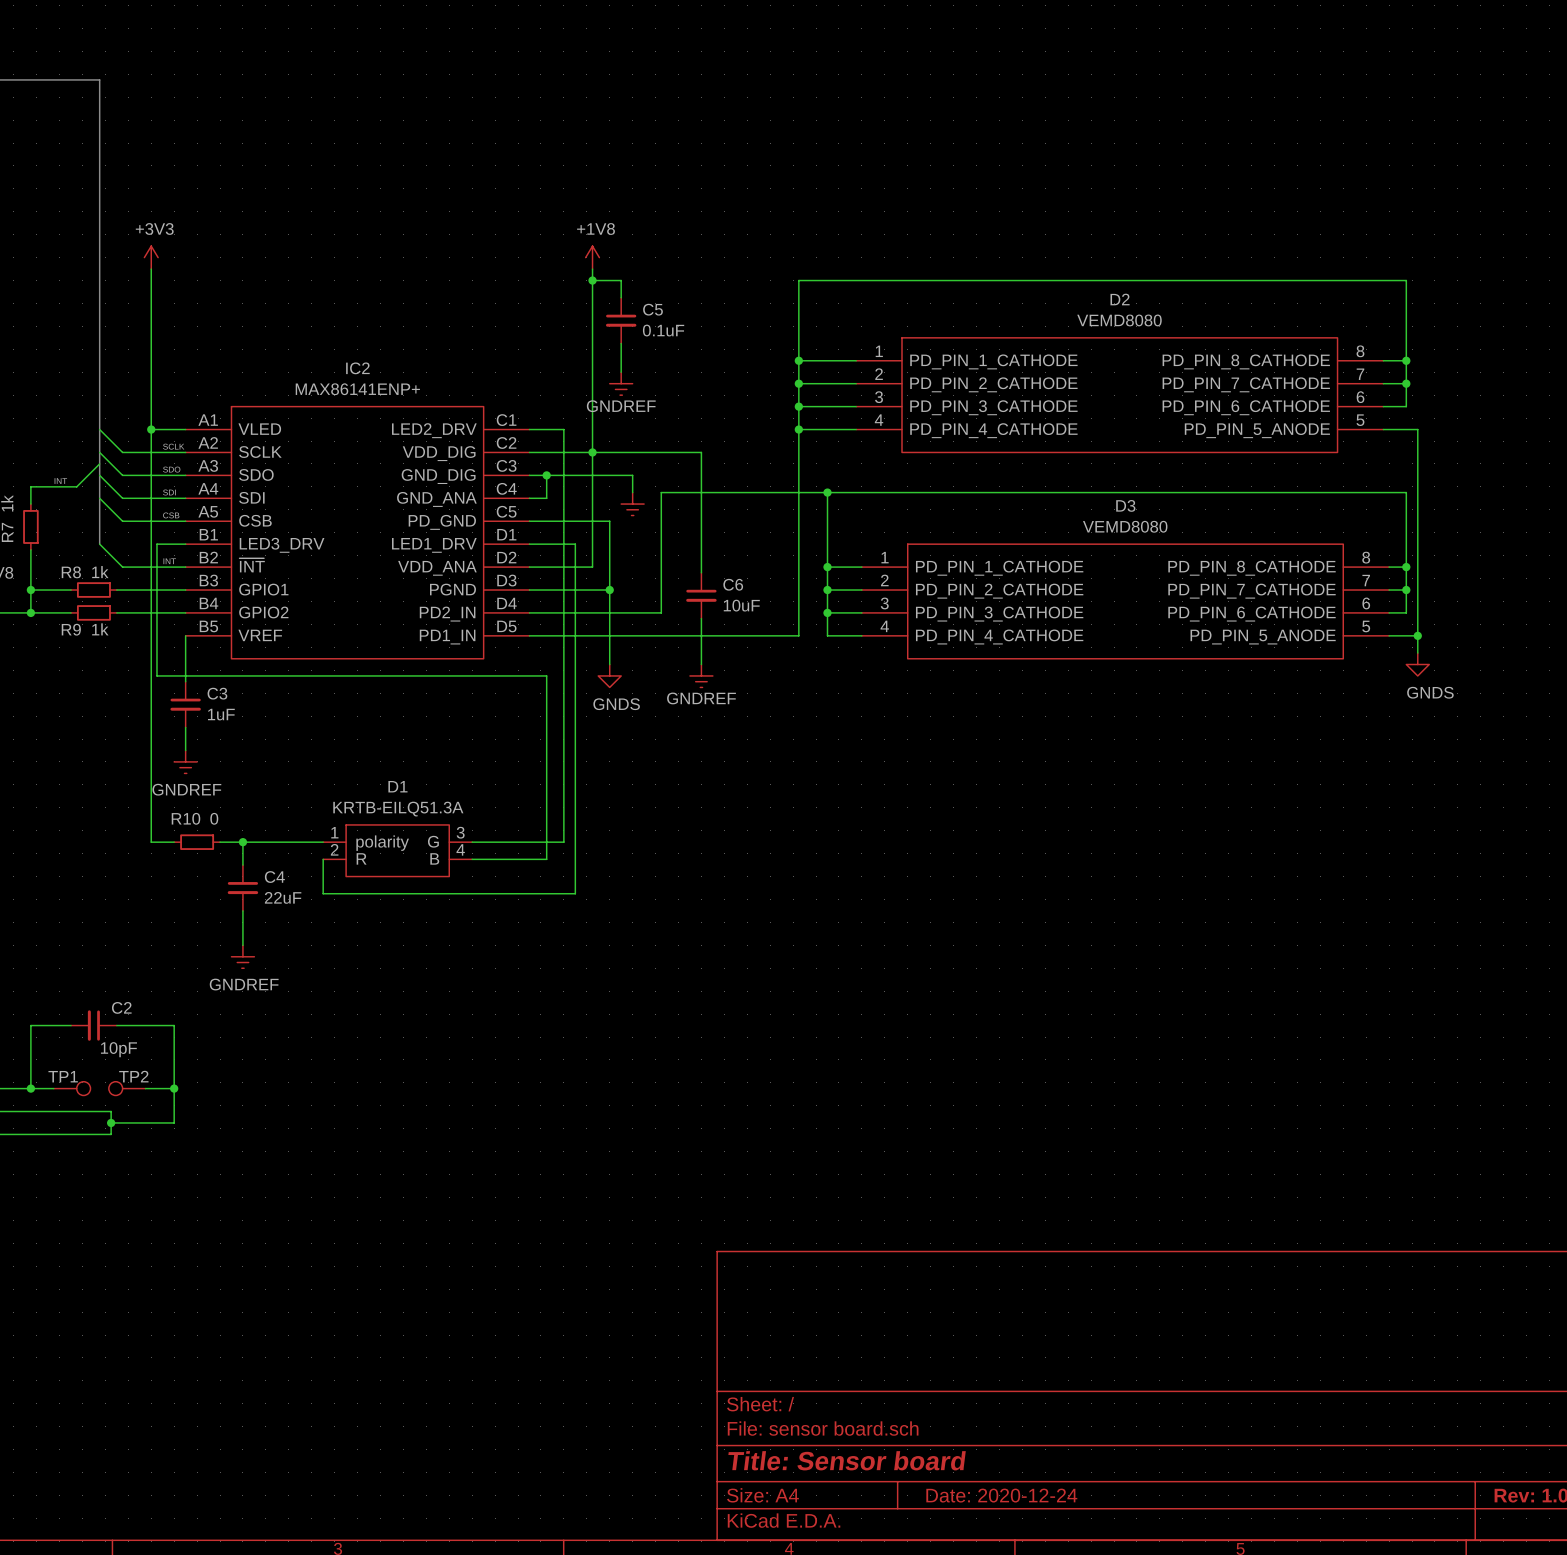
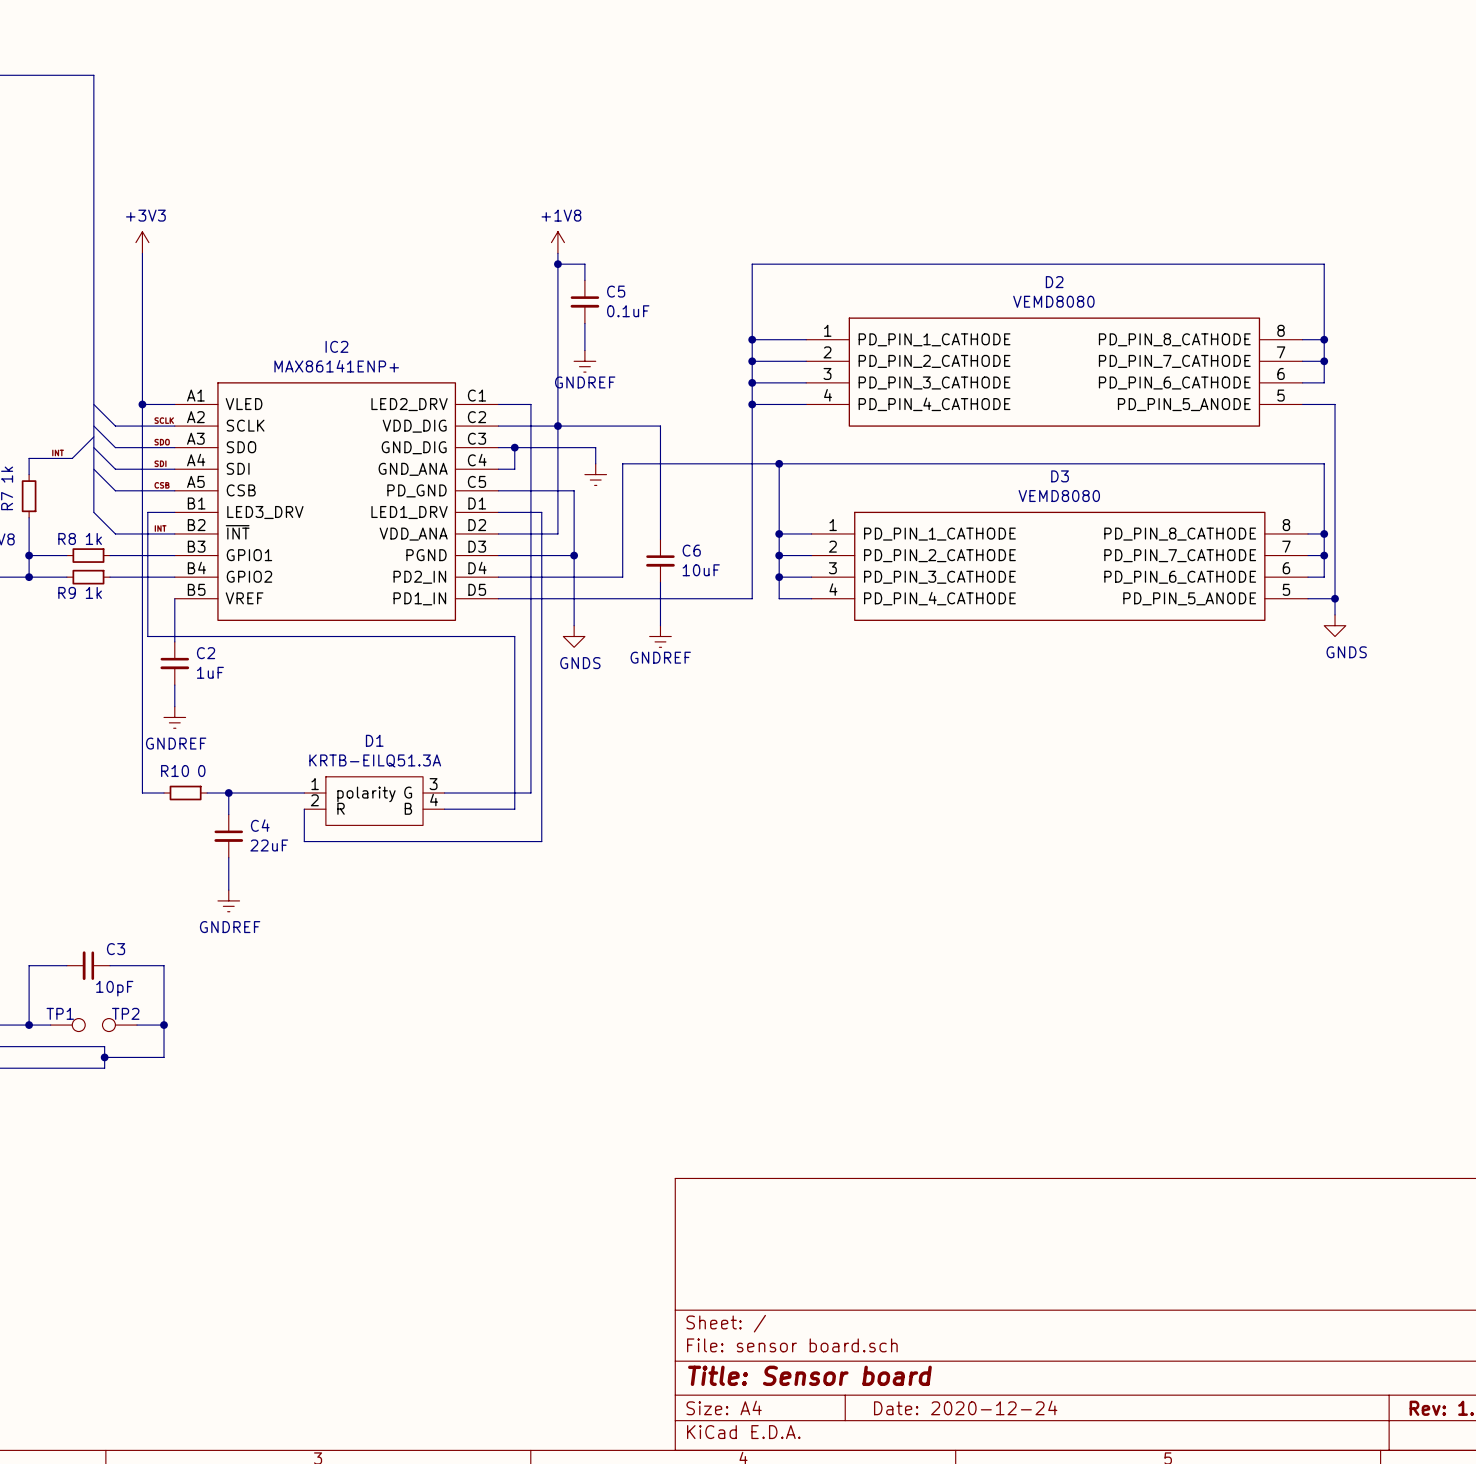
C3 name: C3 (217, 693) -> C2 (206, 653)
C2 name: C2 (121, 1007) -> C3 (116, 949)

